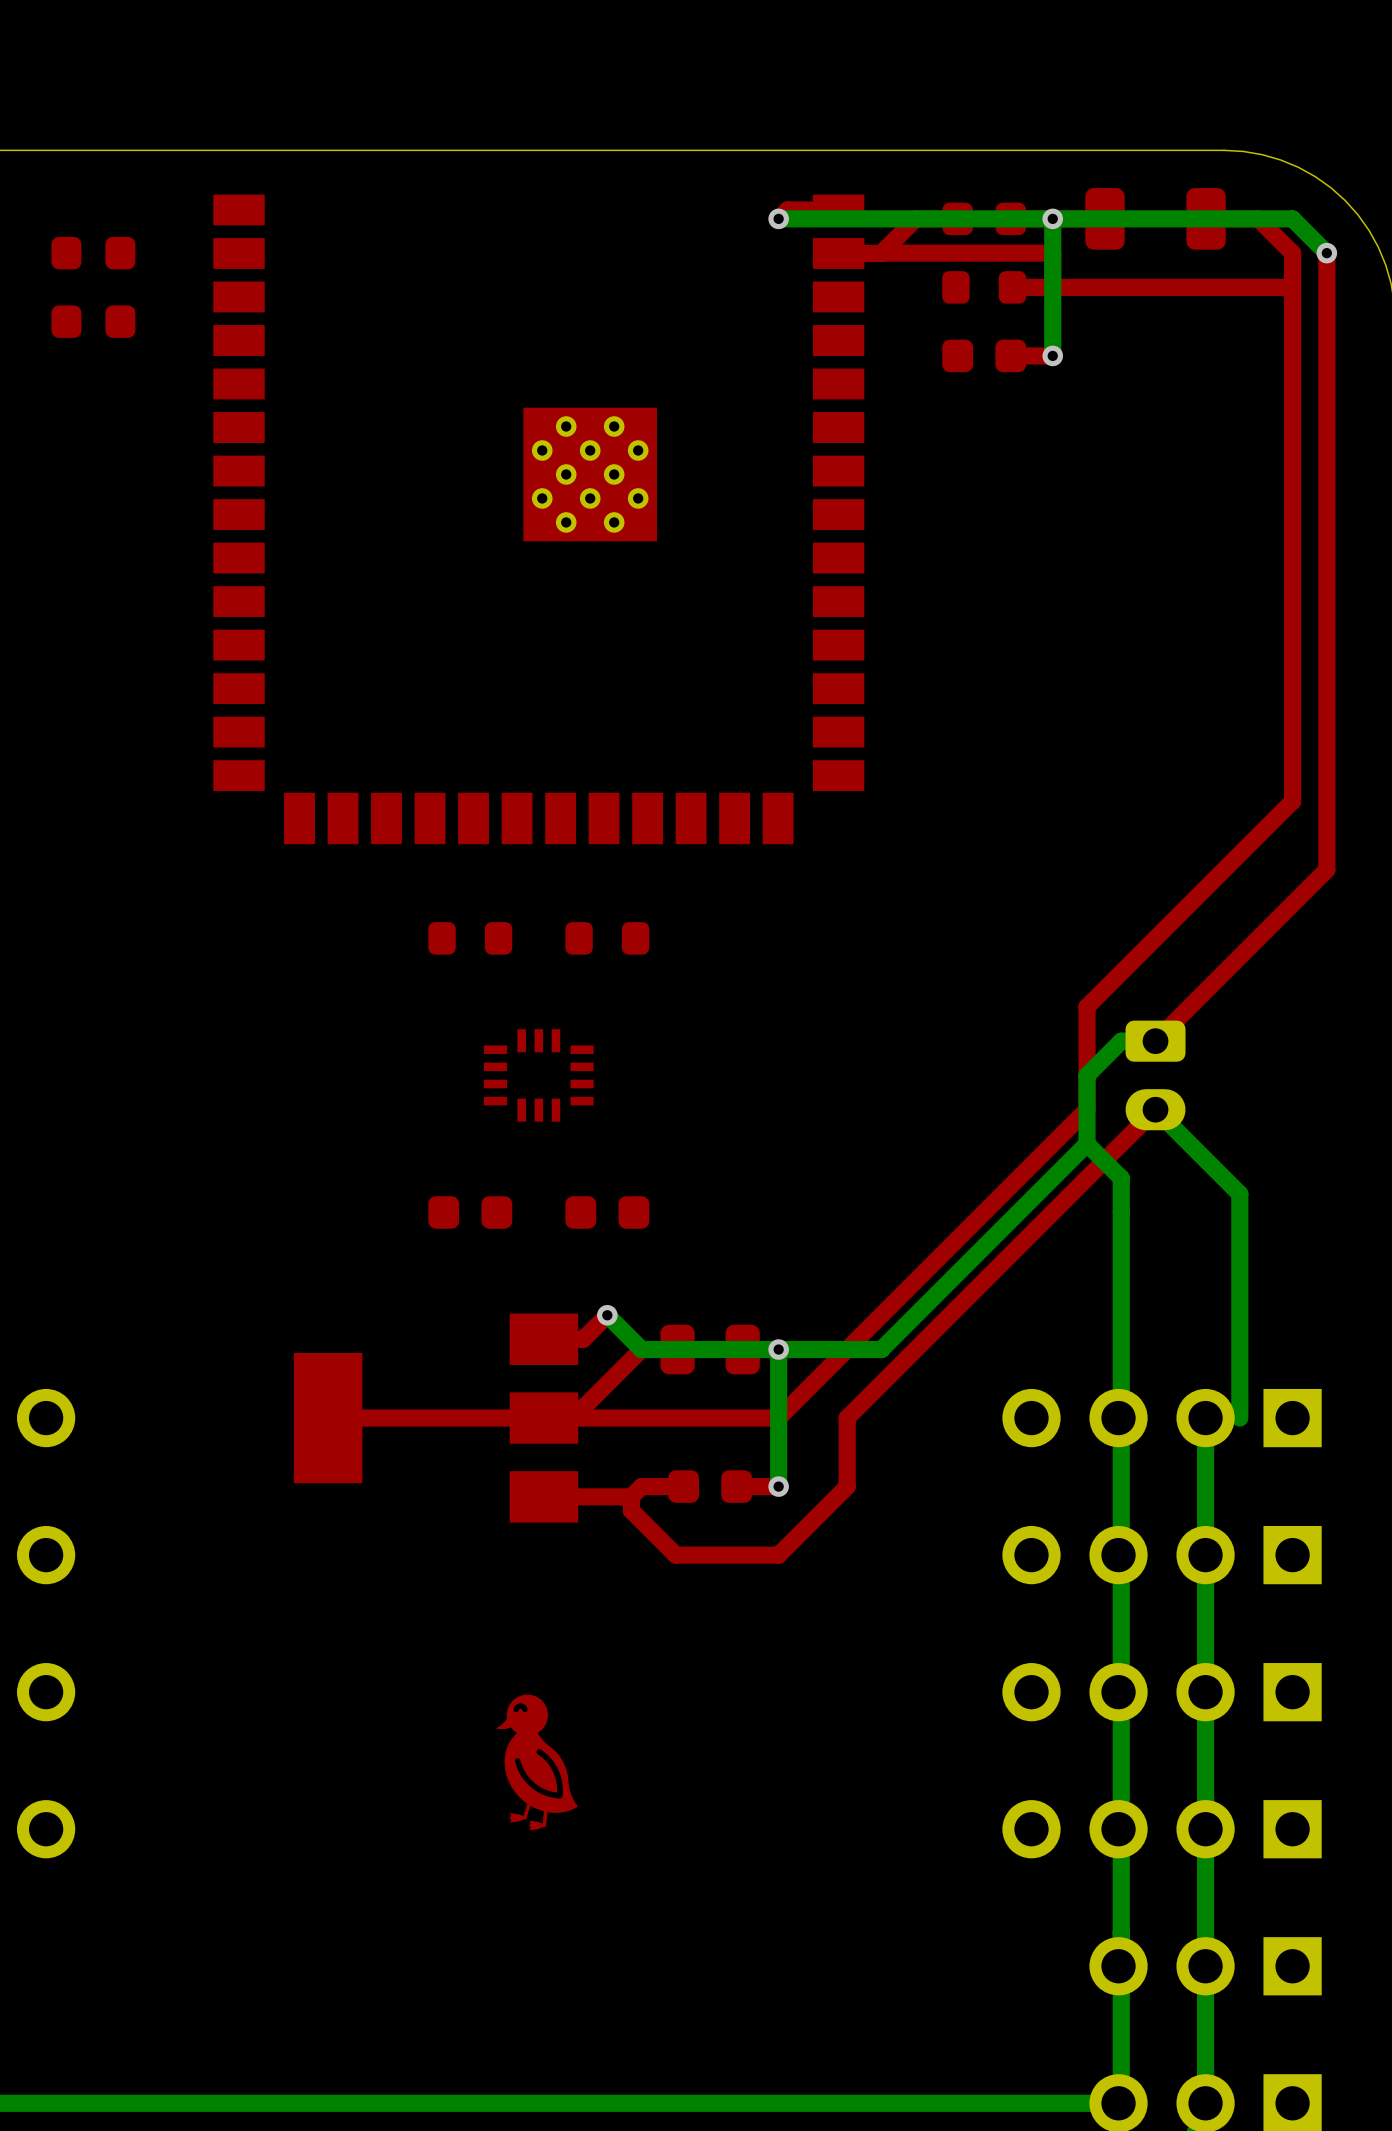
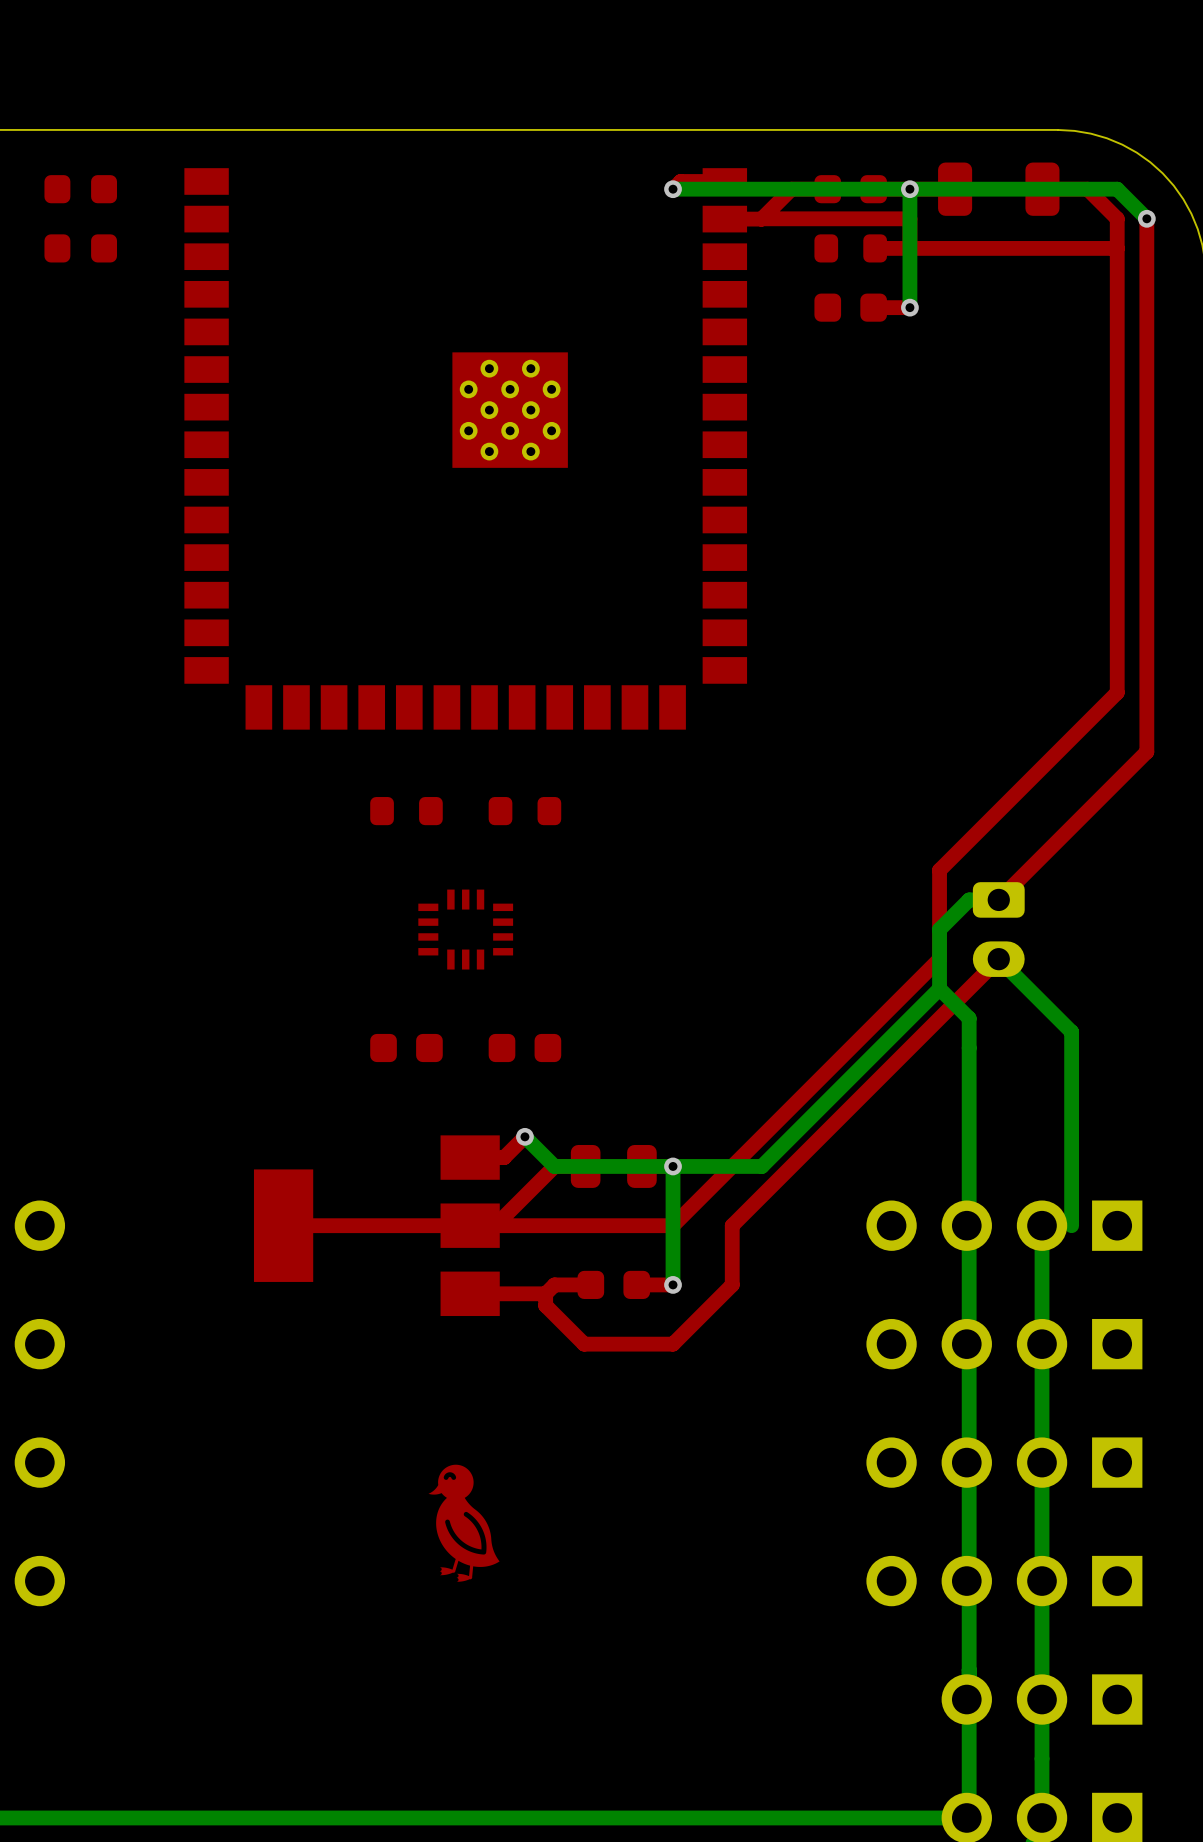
part: none -> (80, 189)
part: (93, 253) -> none
part: none -> (80, 248)
part: (93, 321) -> none

